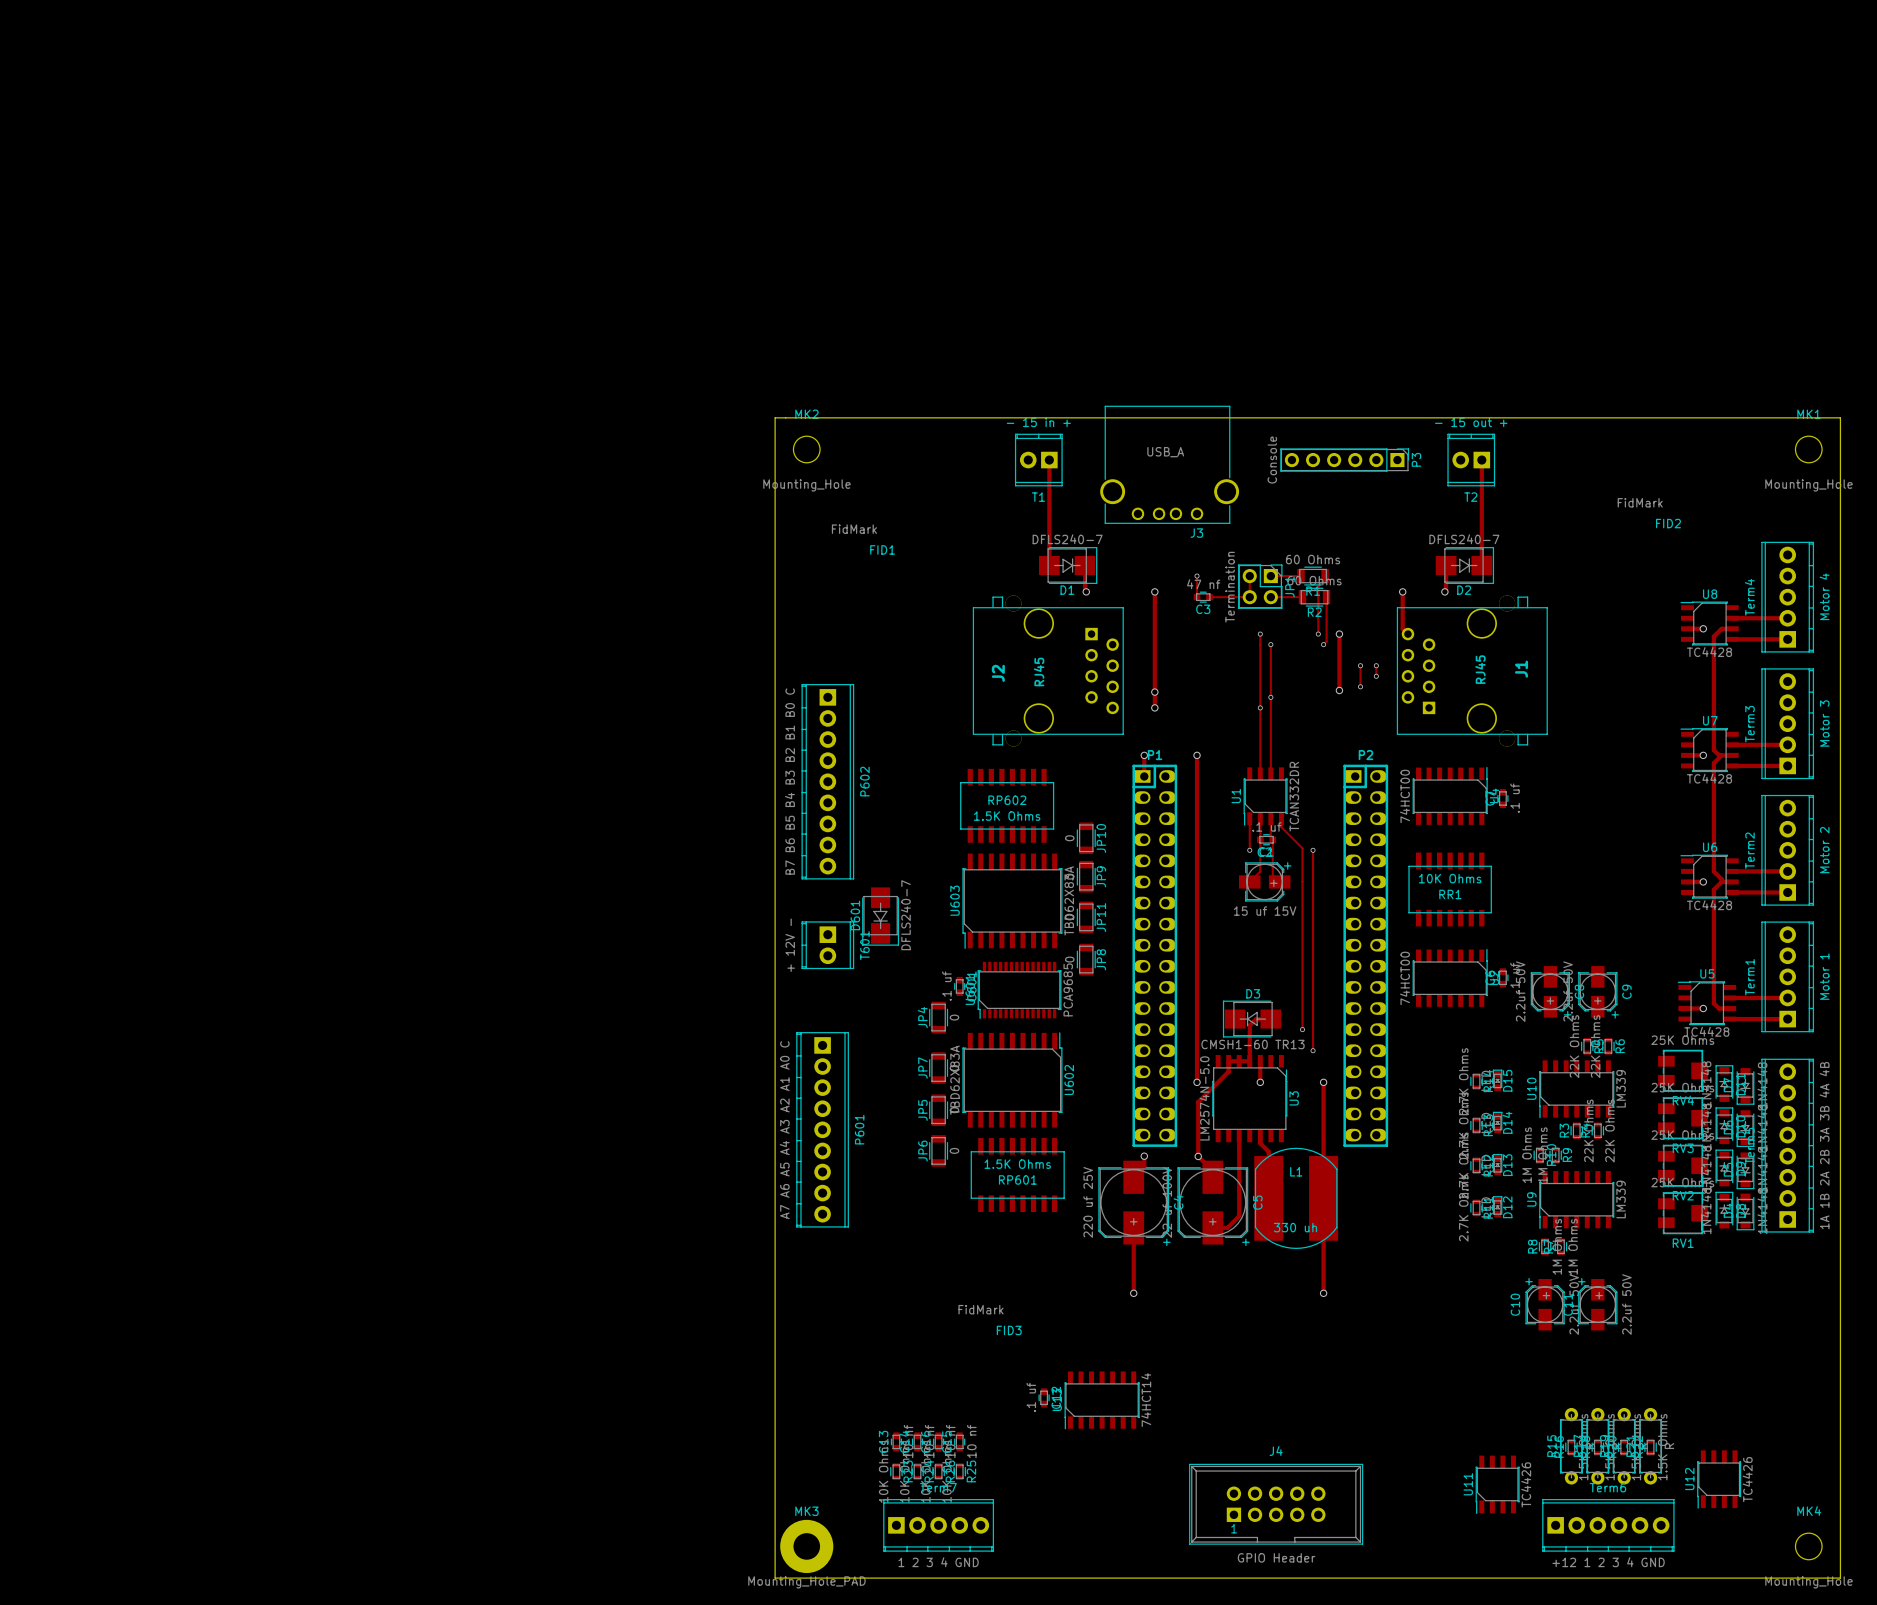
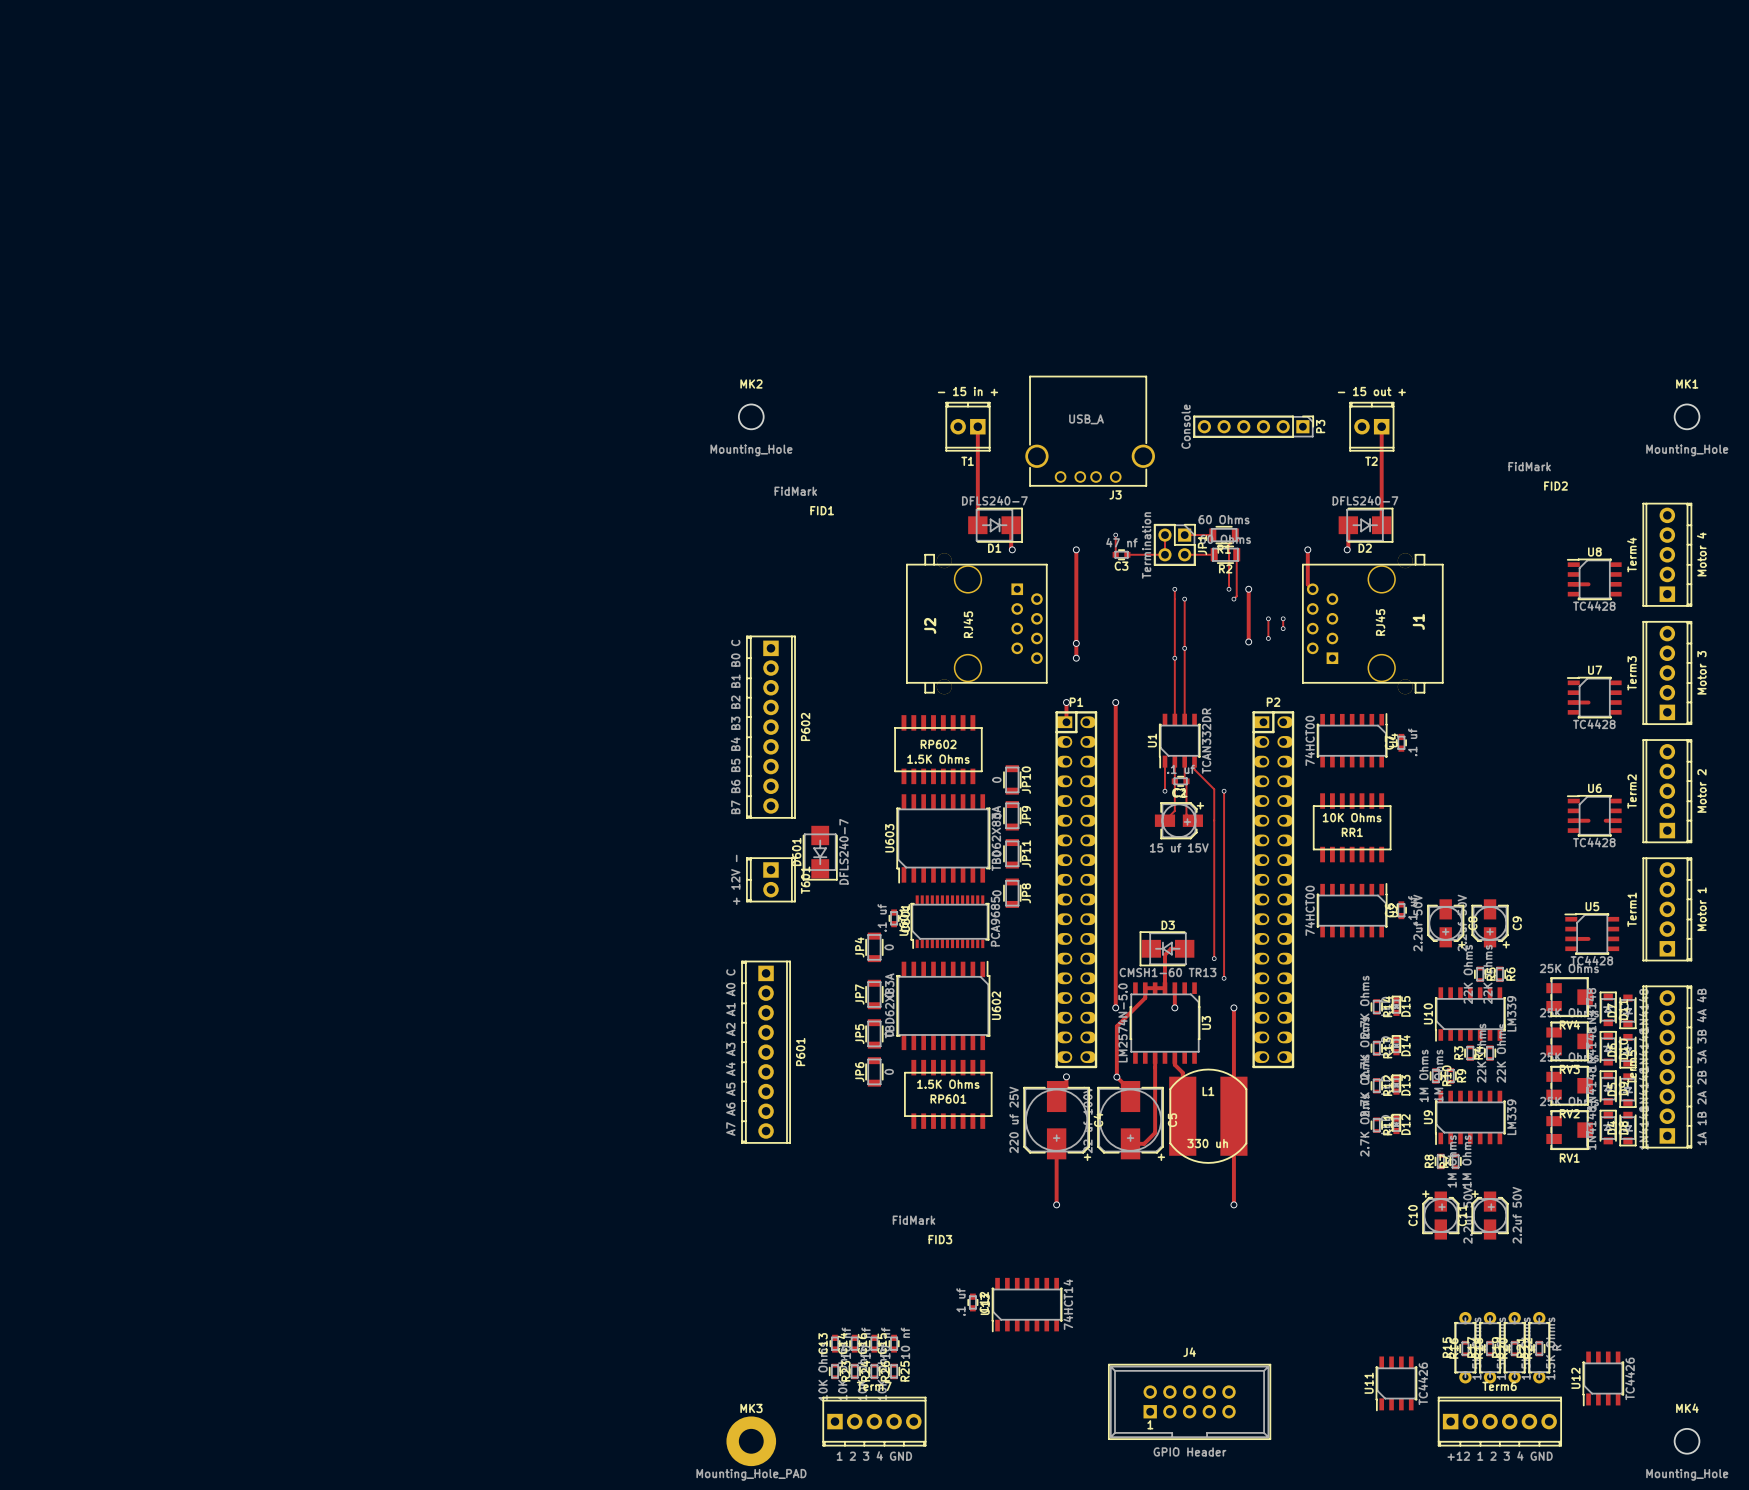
board edge: (775, 417) (1840, 417) (1840, 1578) (775, 1578) (775, 417) -> none
track: (1732, 618) (1787, 618) -> none
via: (1703, 628) -> none
track: (1732, 628) (1721, 628) (1713, 636) (1713, 750) (1719, 755) (1732, 755) -> none
track: (1732, 639) (1787, 639) -> none
track: (1732, 744) (1787, 744) -> none
via: (1703, 755) -> none
track: (1721, 755) (1713, 763) (1713, 871) (1721, 879) (1721, 881) (1713, 889) (1713, 1003) (1719, 1008) (1729, 1008) -> none
track: (1732, 765) (1787, 765) -> none
track: (1732, 871) (1787, 871) -> none
via: (1703, 881) -> none
track: (1732, 892) (1787, 892) -> none
track: (1729, 997) (1787, 997) -> none
via: (1703, 1008) -> none
track: (1729, 1019) (1787, 1019) -> none

